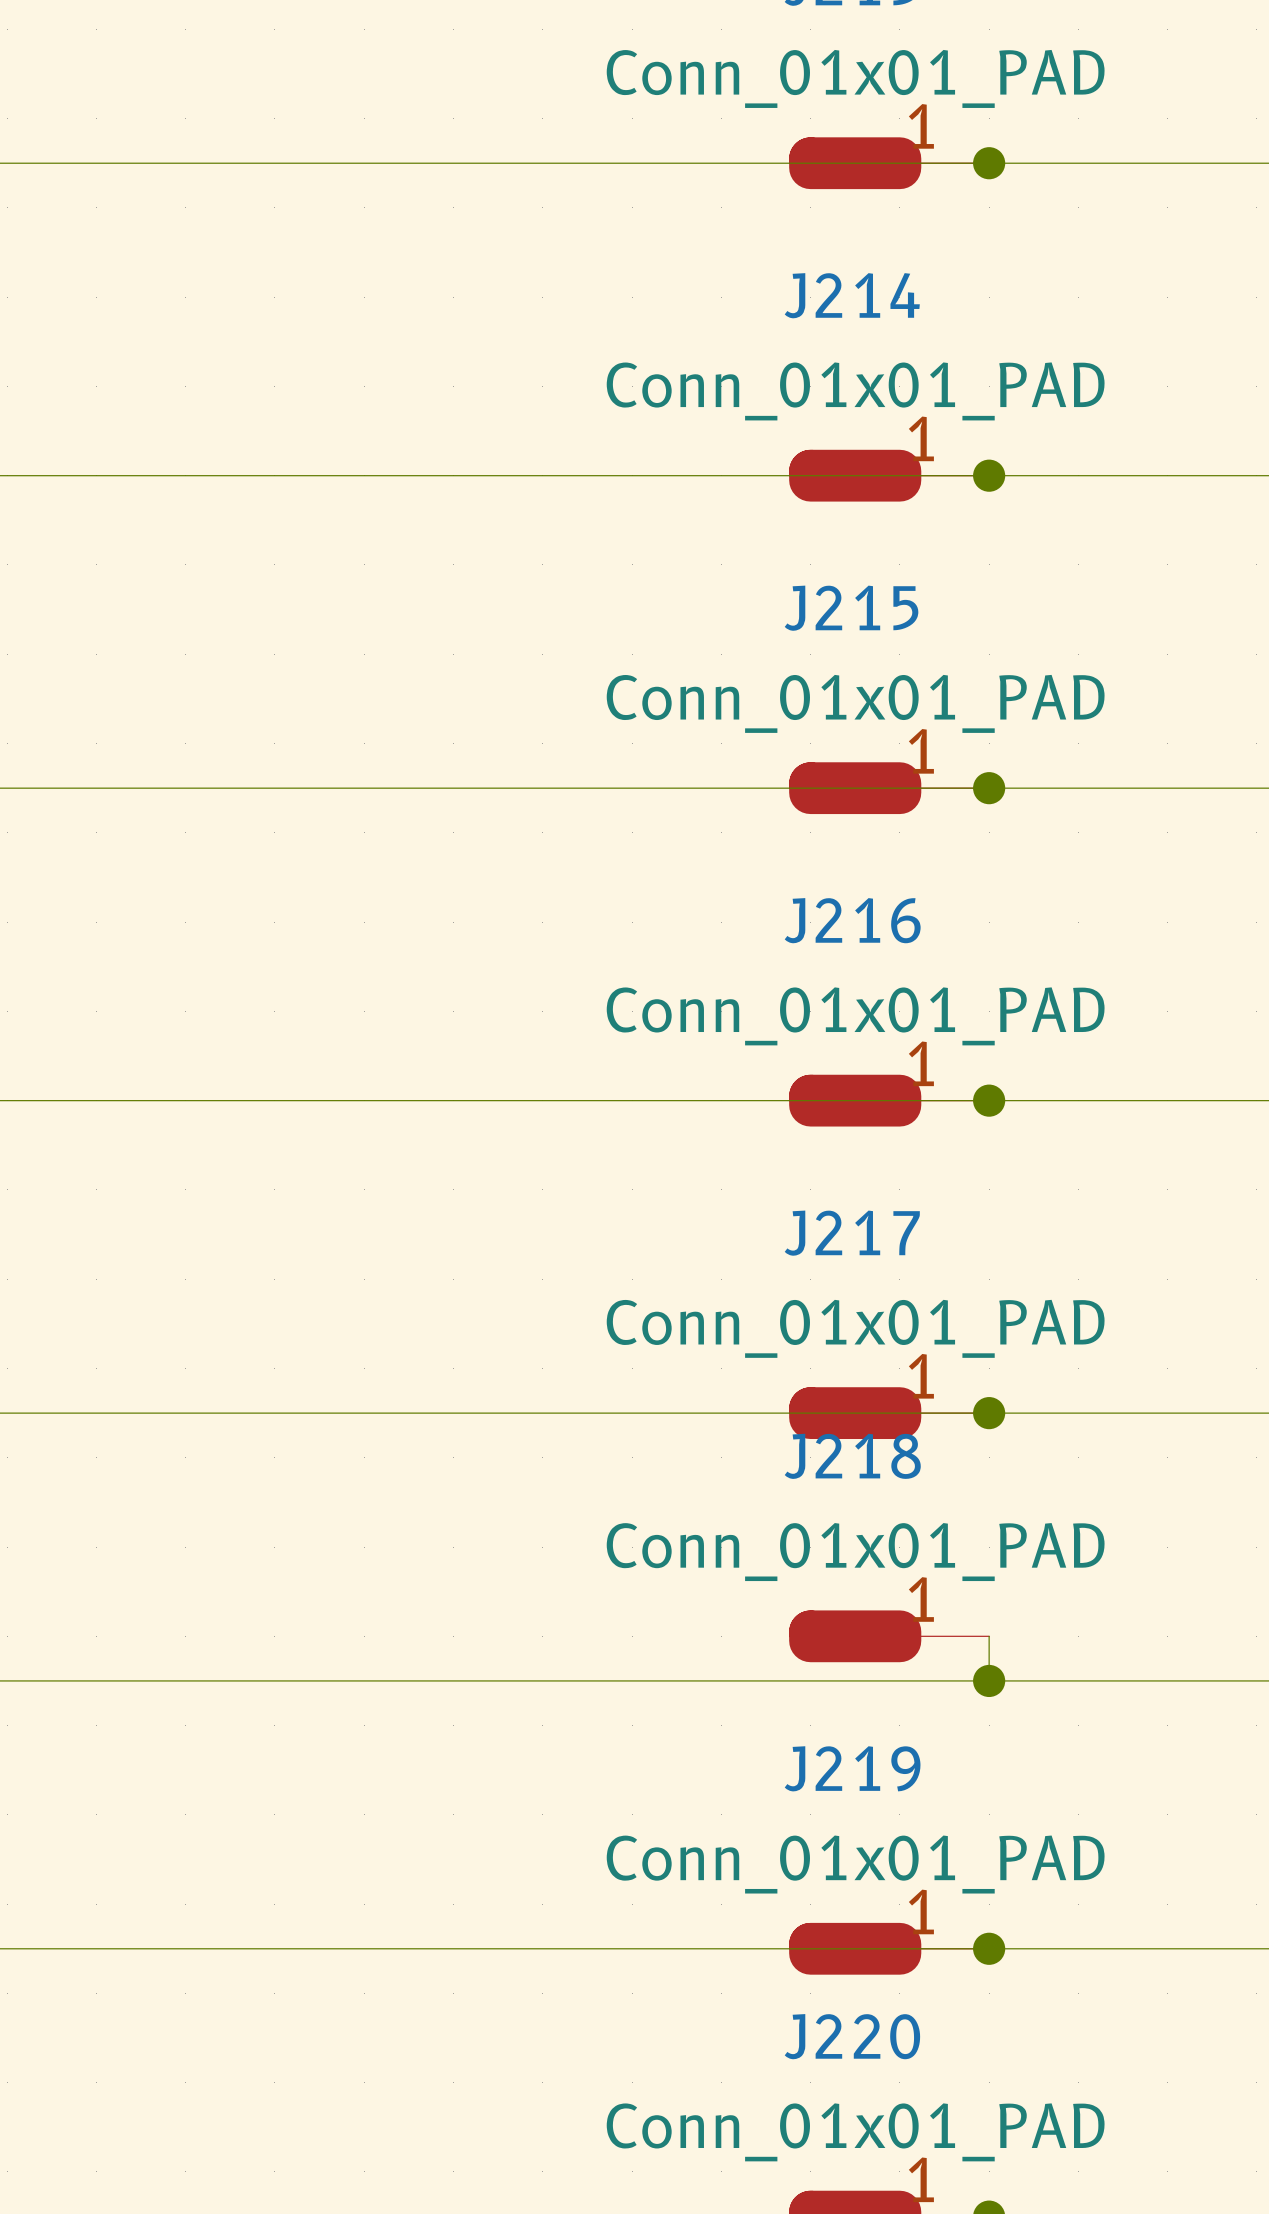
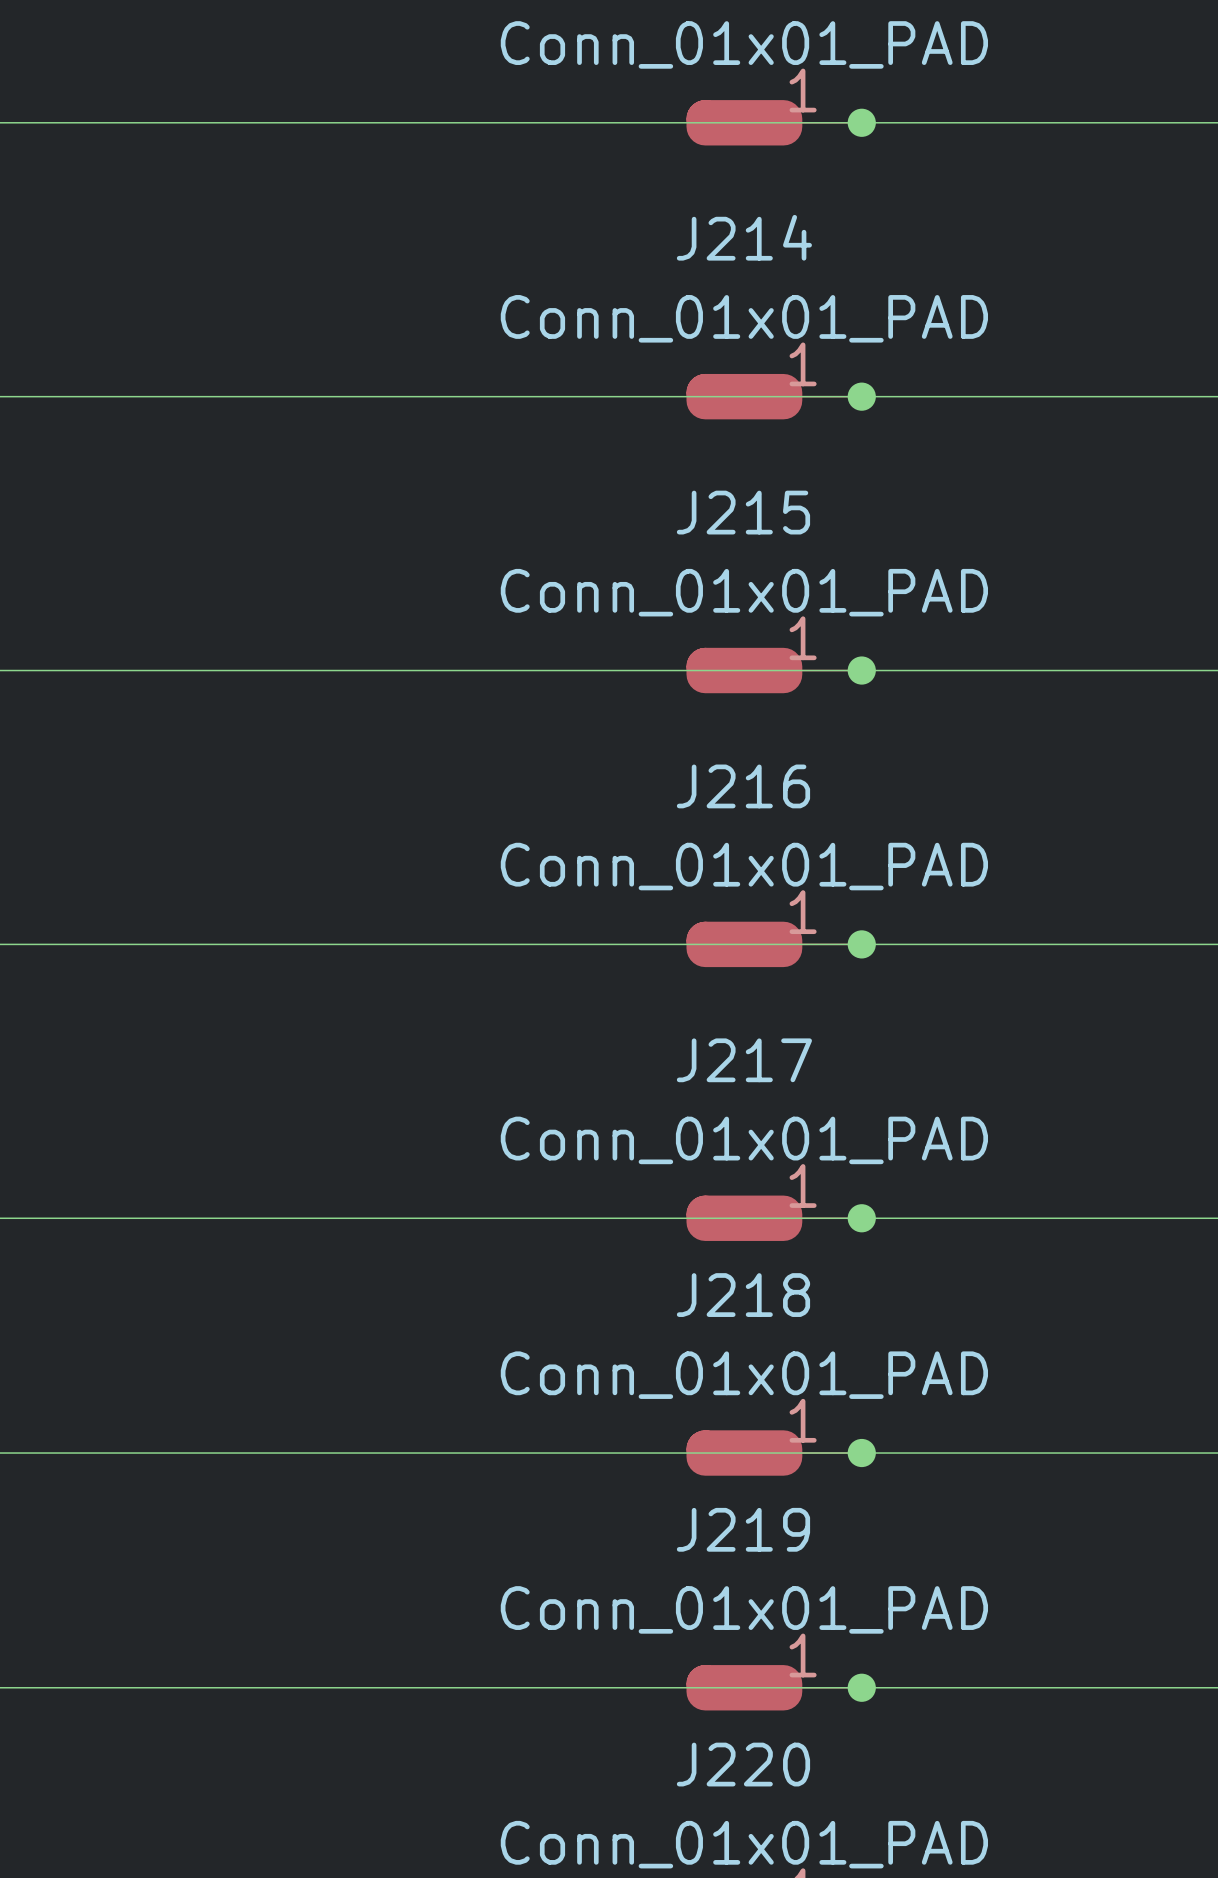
J218 position: (889, 1636) -> (774, 1453)
wire: (989, 1636) (989, 1680) -> none

